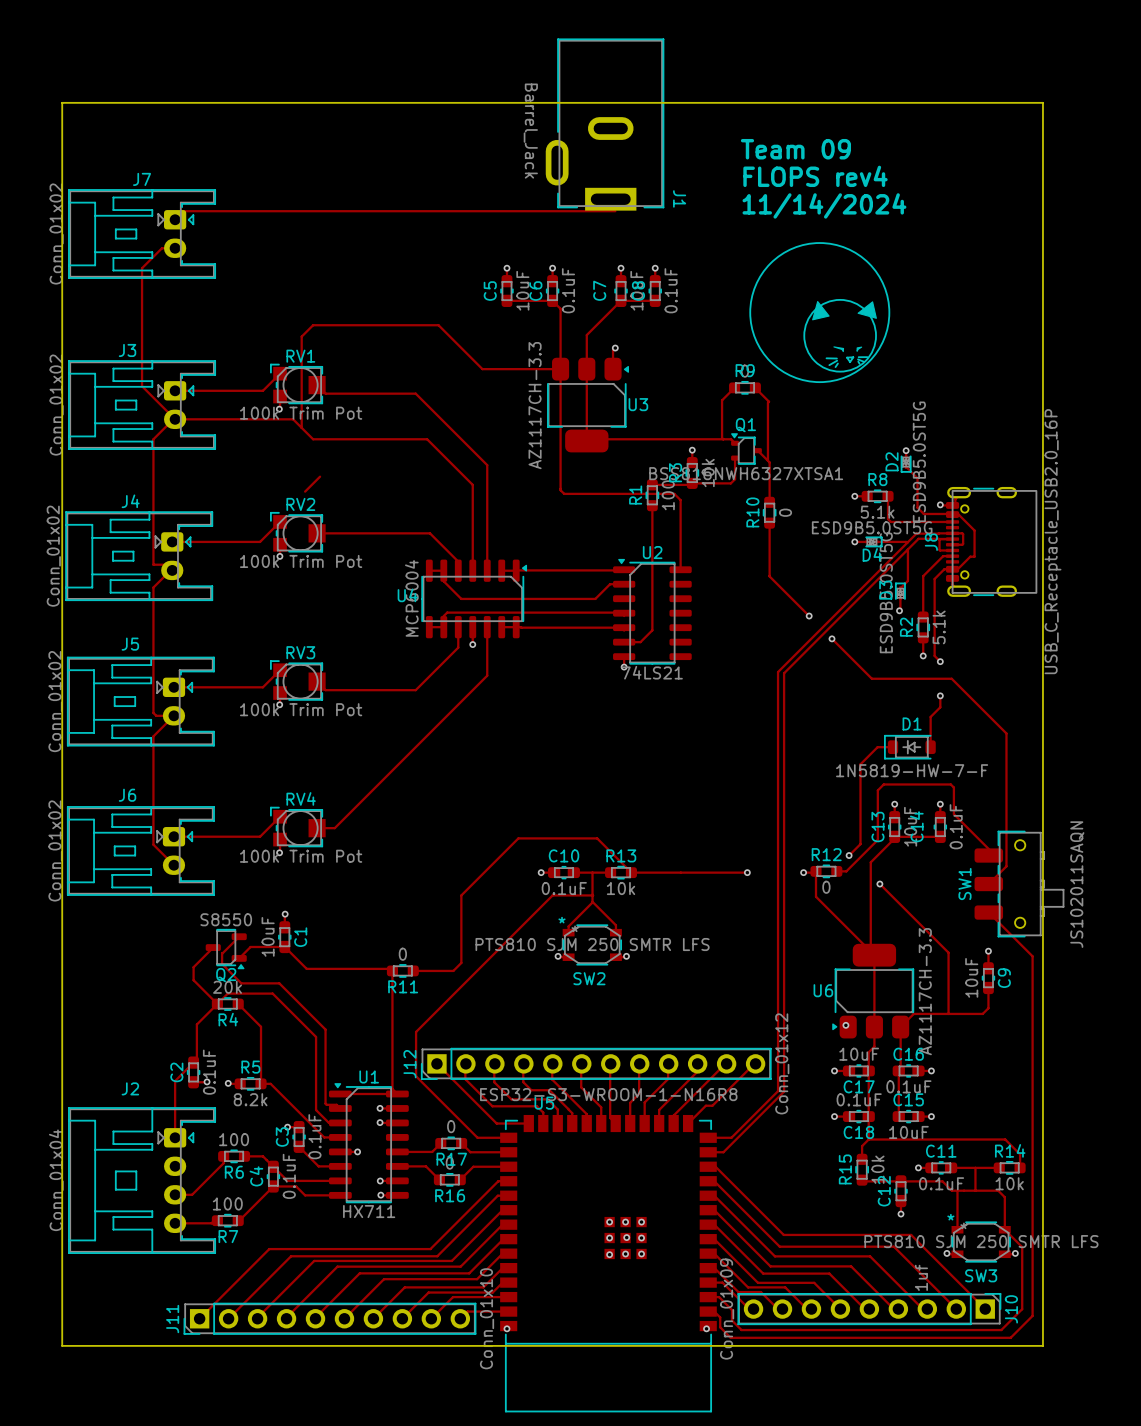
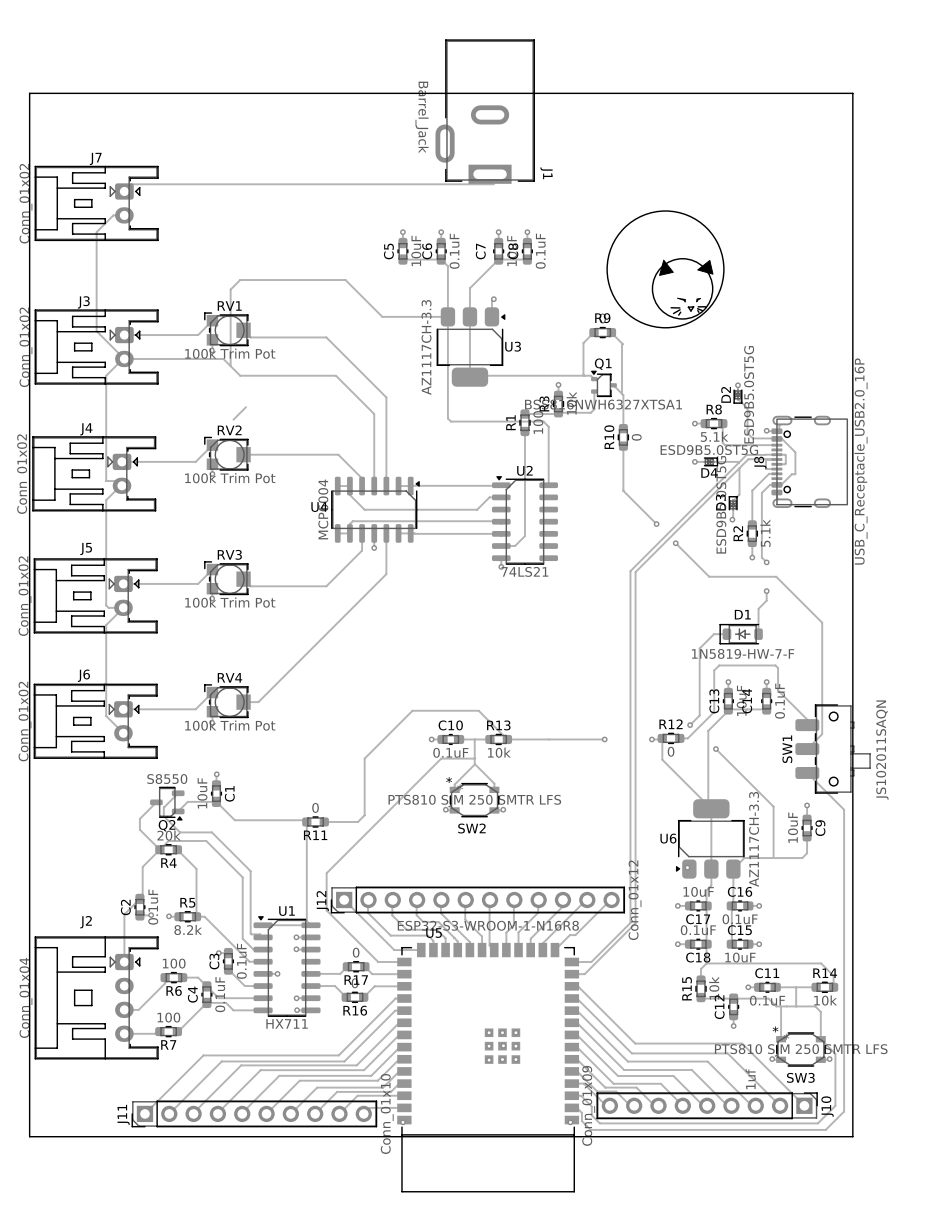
text: Team 09 (795, 149) -> none
text: FLOPS rev4 (815, 176) -> none
text: 11/14/2024 (824, 205) -> none

